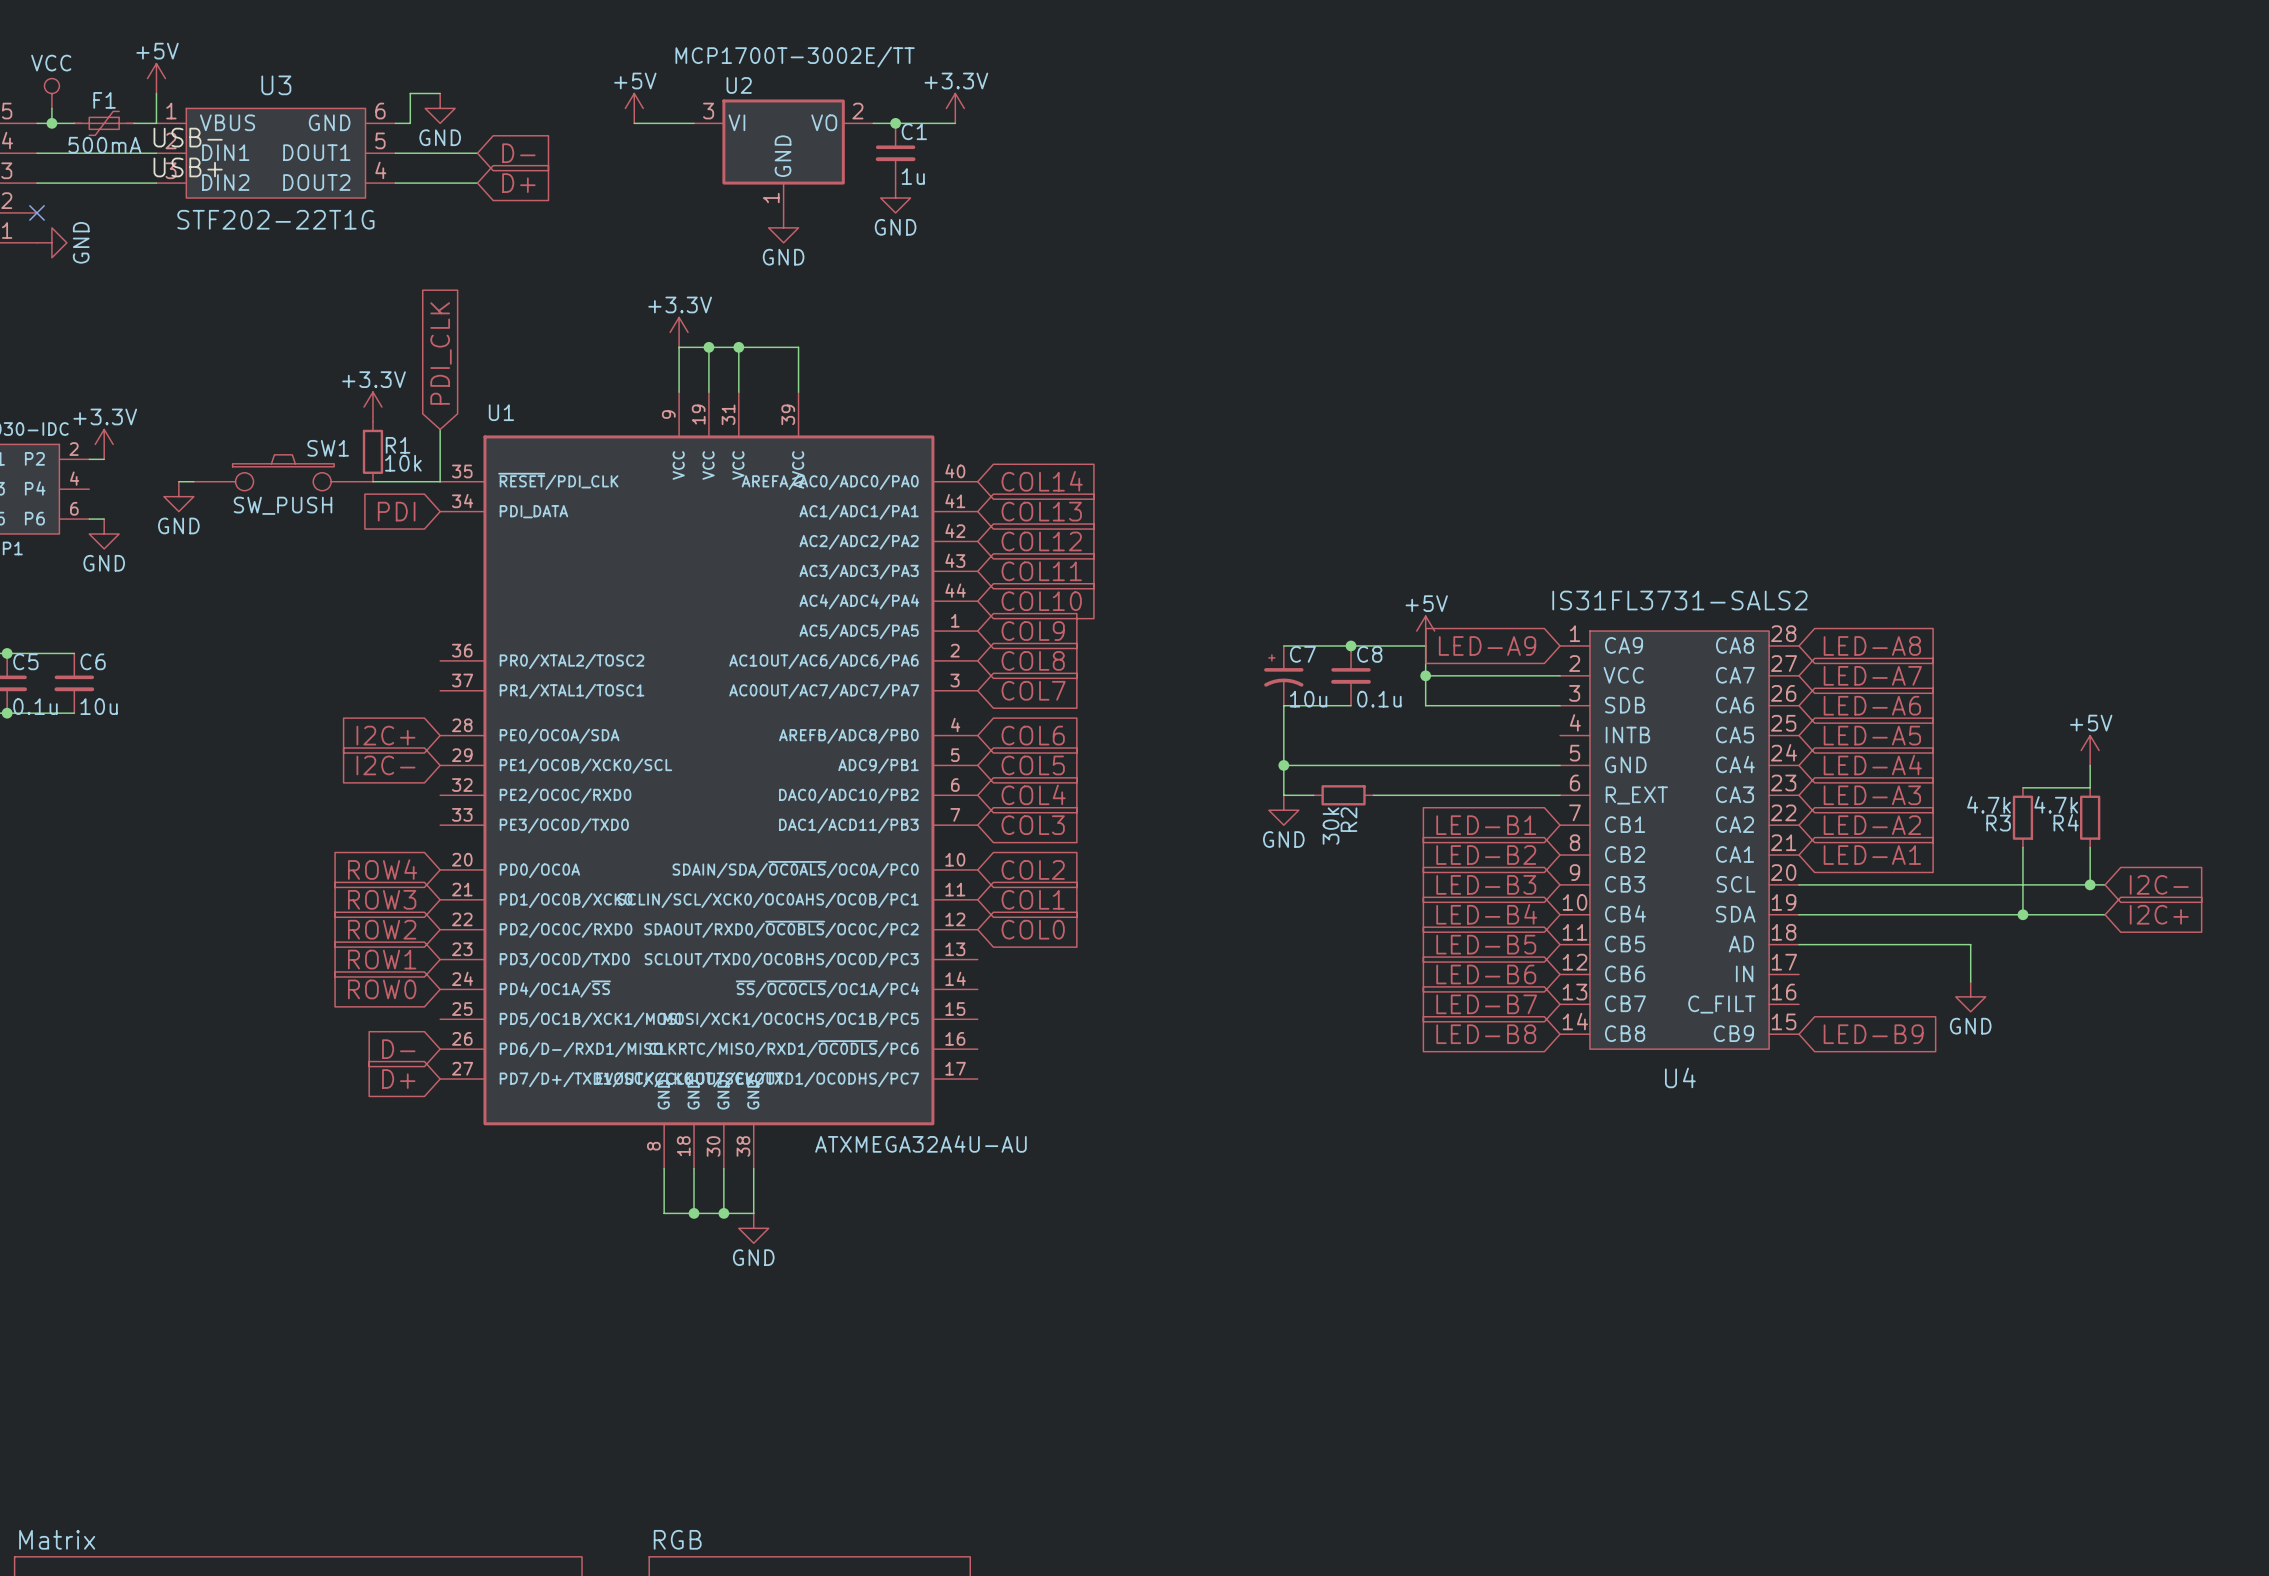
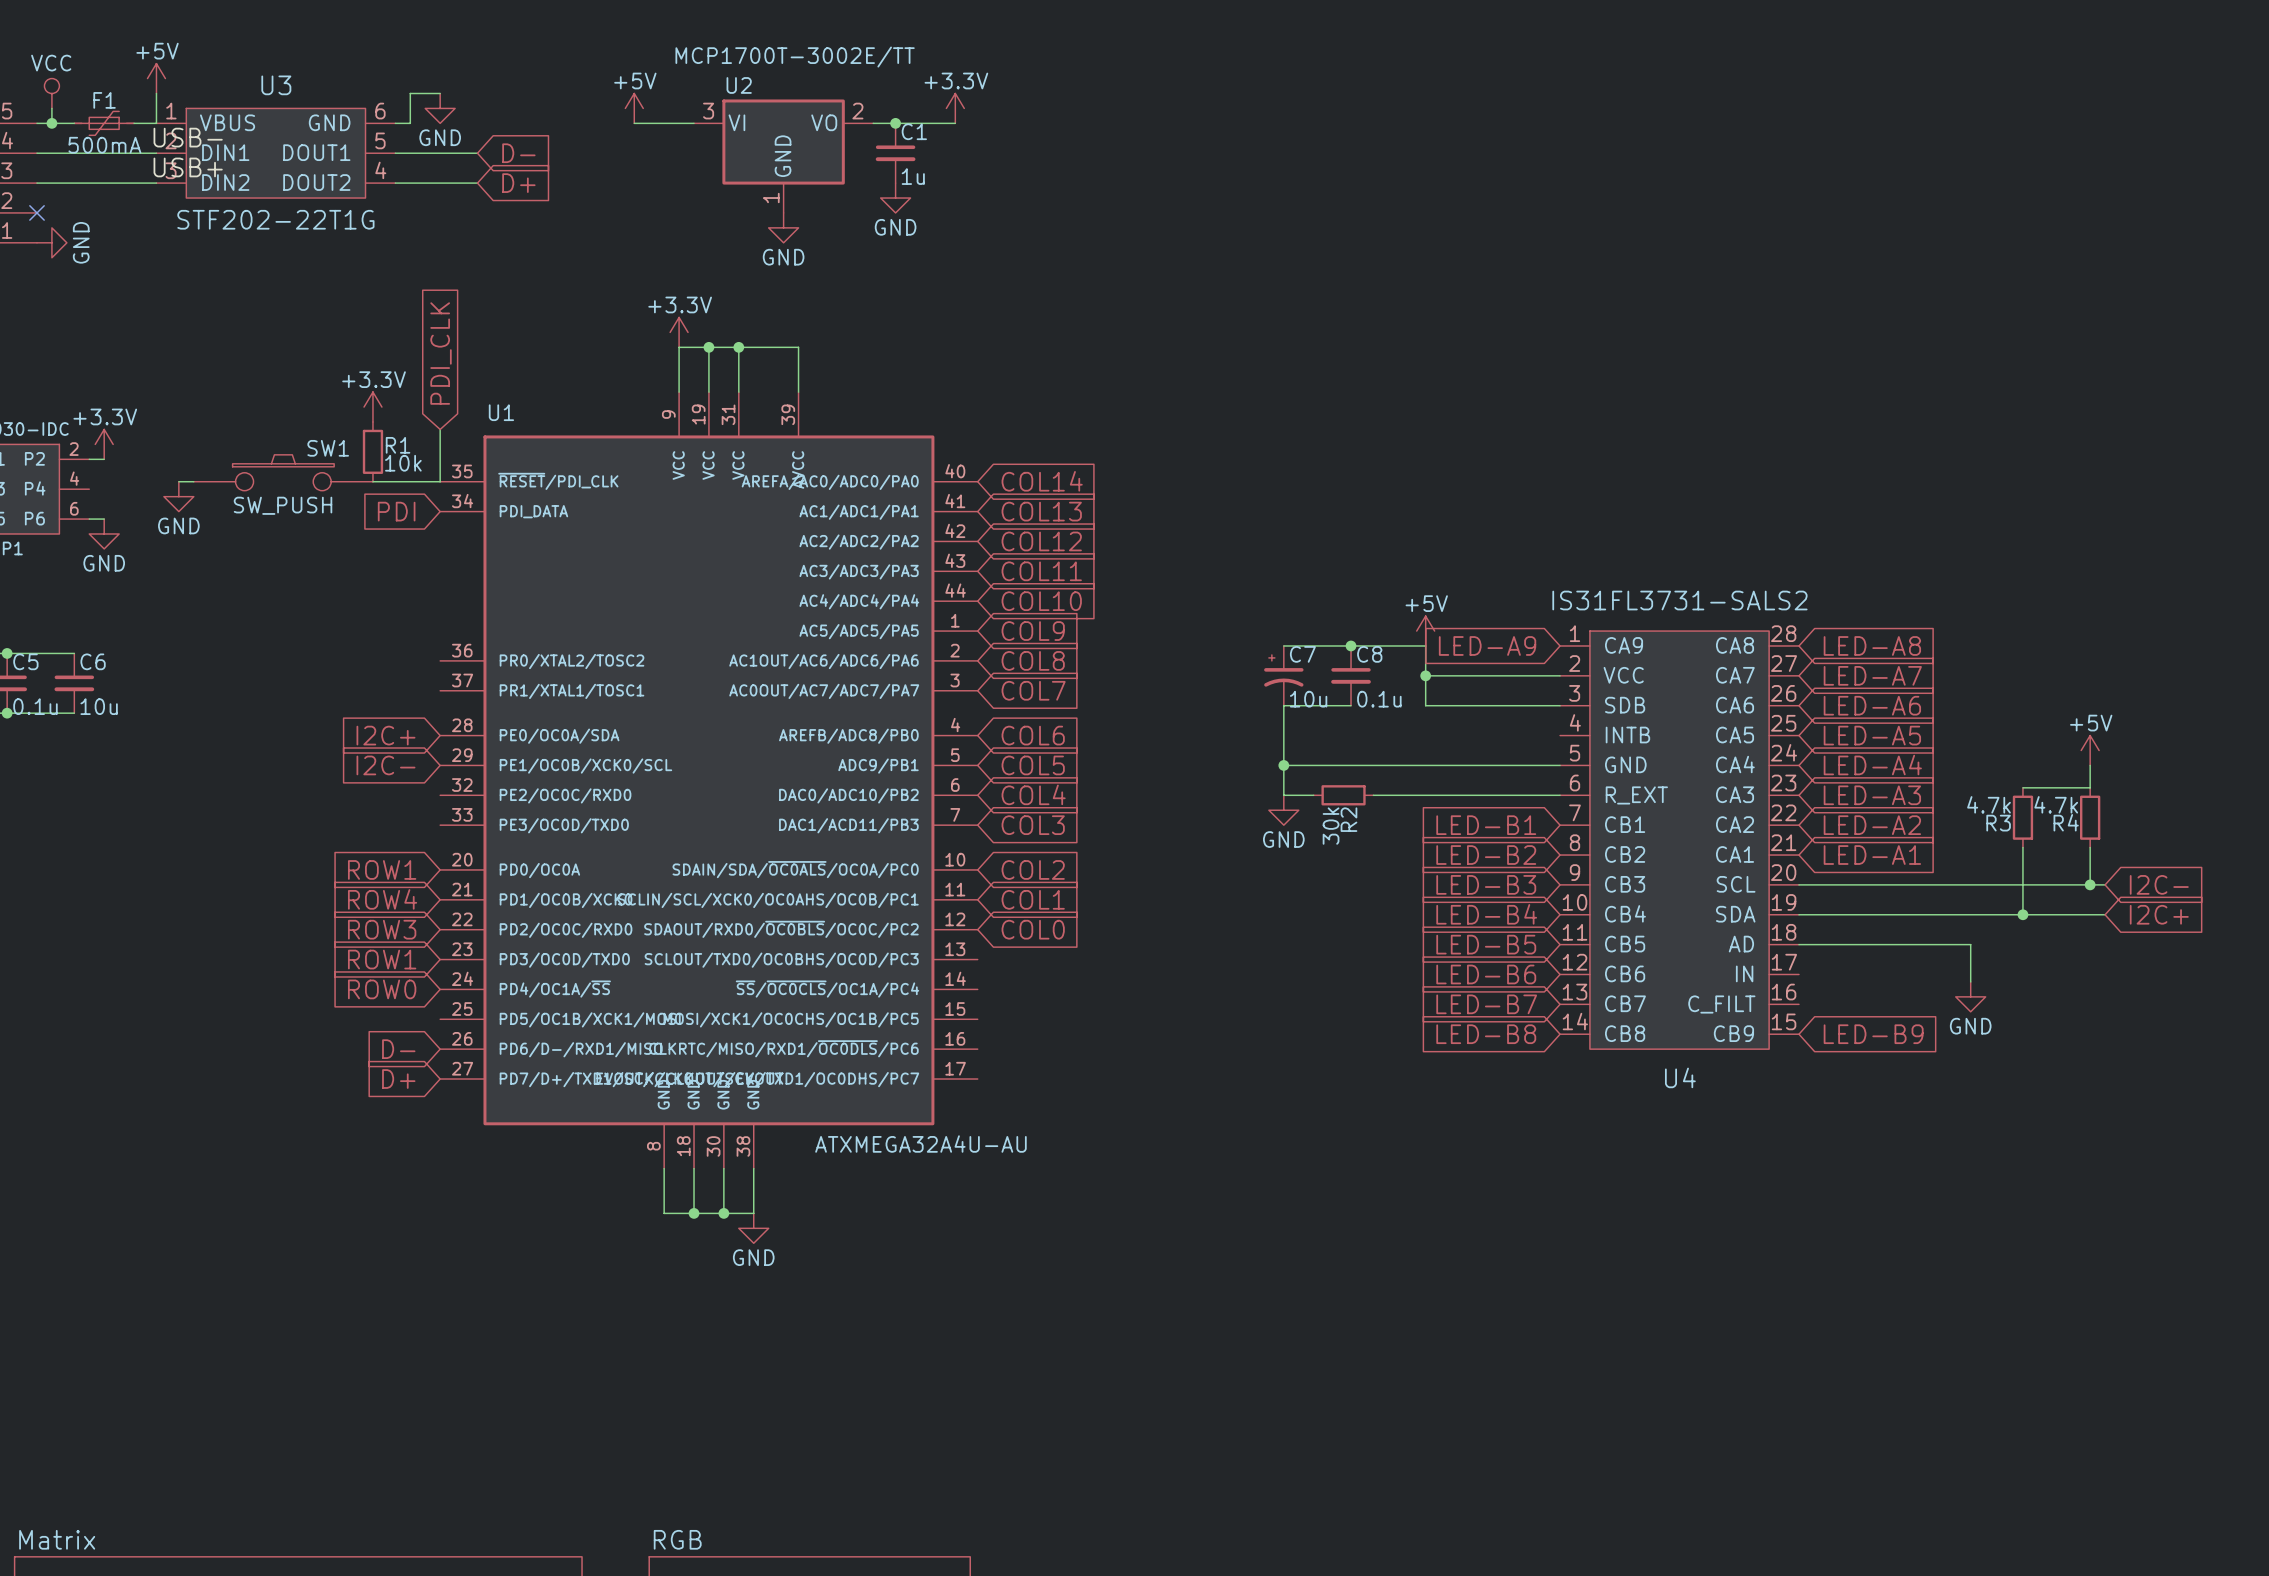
global label: ROW4 (382, 869) -> ROW1 (382, 869)
global label: ROW3 (382, 899) -> ROW4 (382, 899)
global label: ROW2 (382, 929) -> ROW3 (382, 929)

